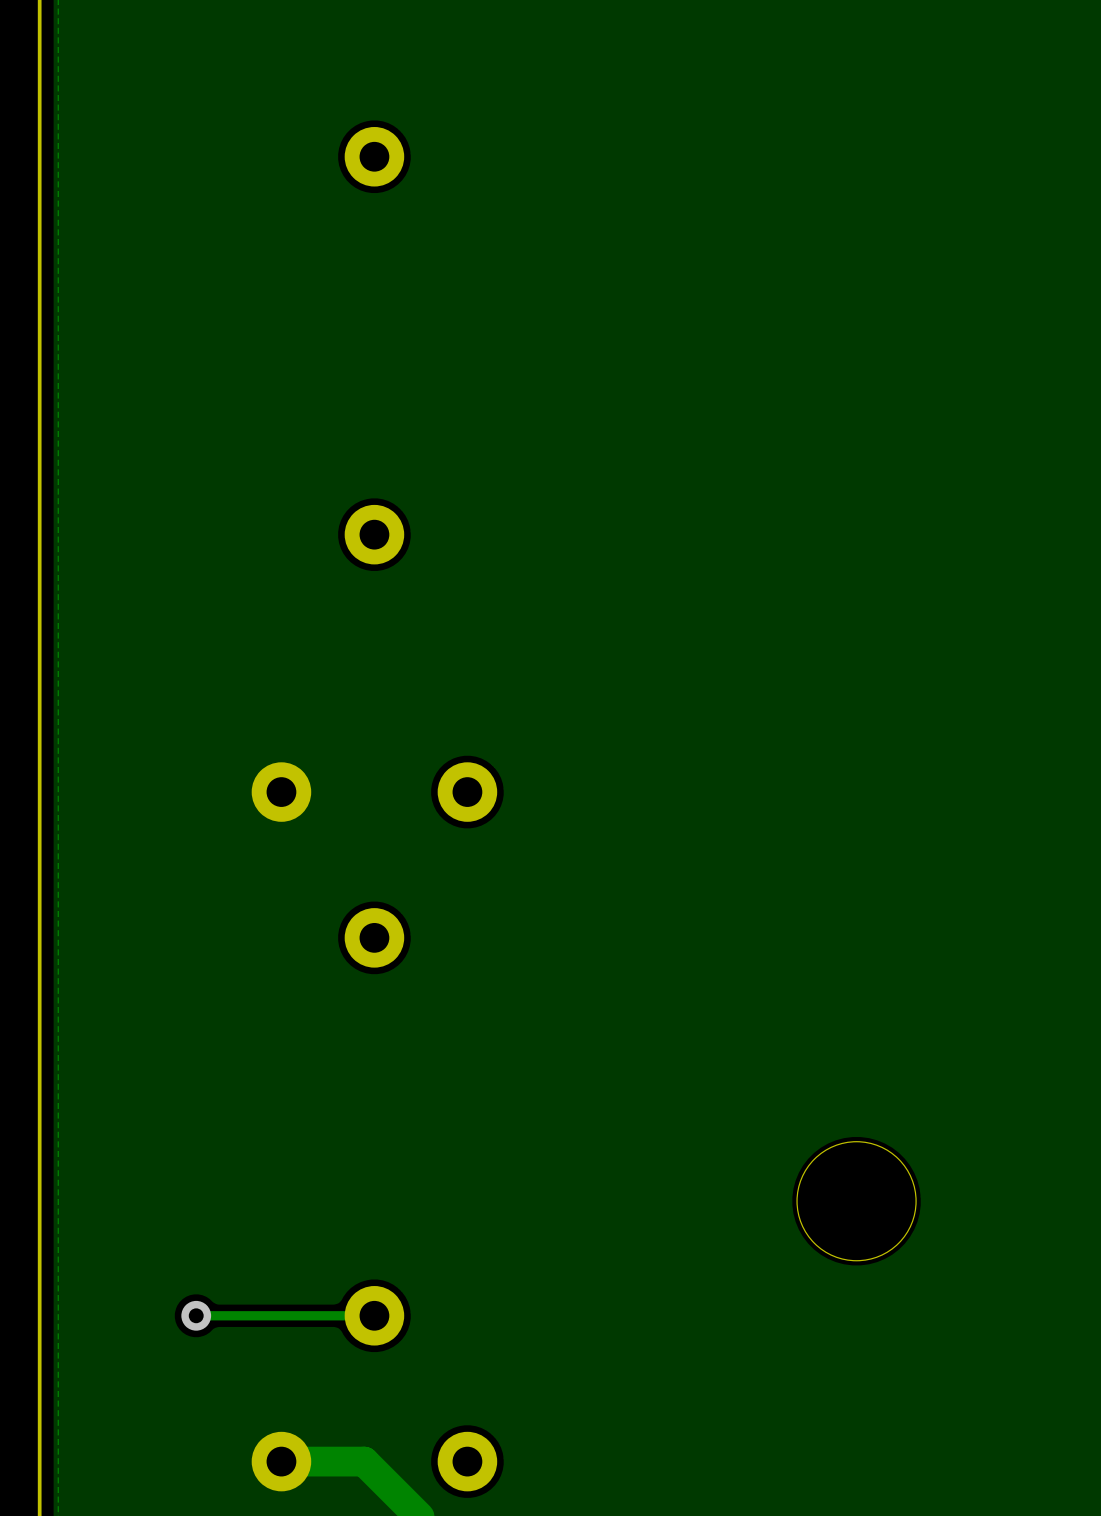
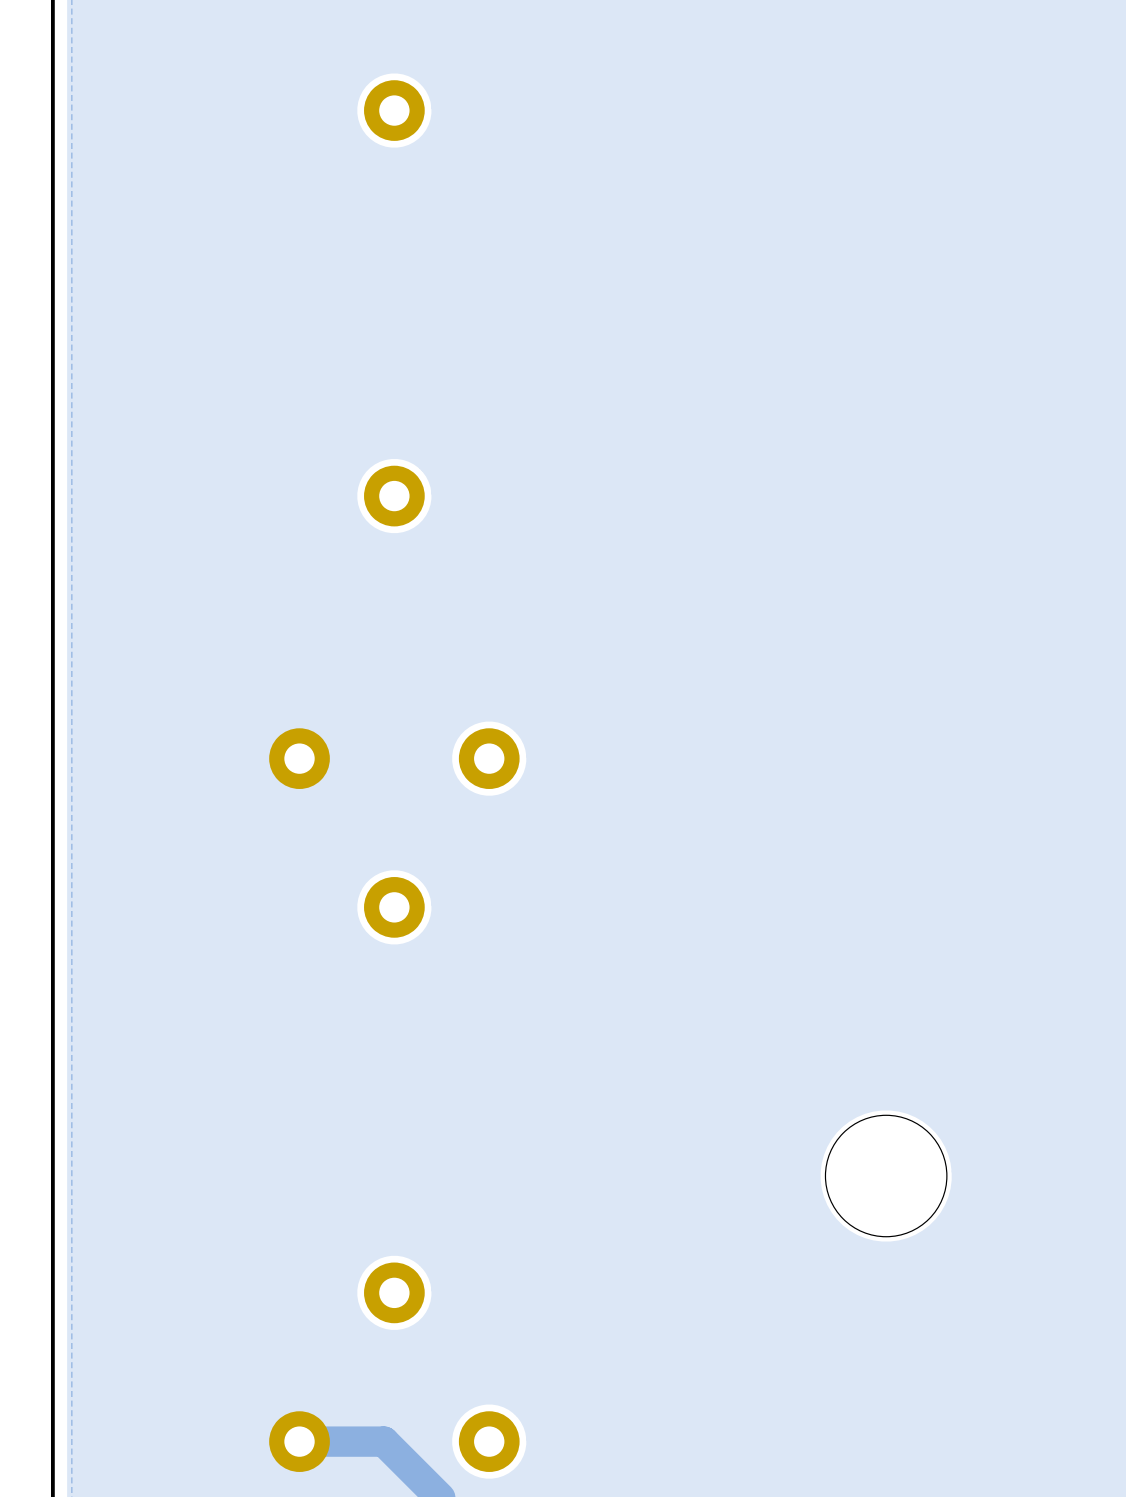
via: (196, 1315) -> none
track: (374, 1315) (196, 1315) -> none

